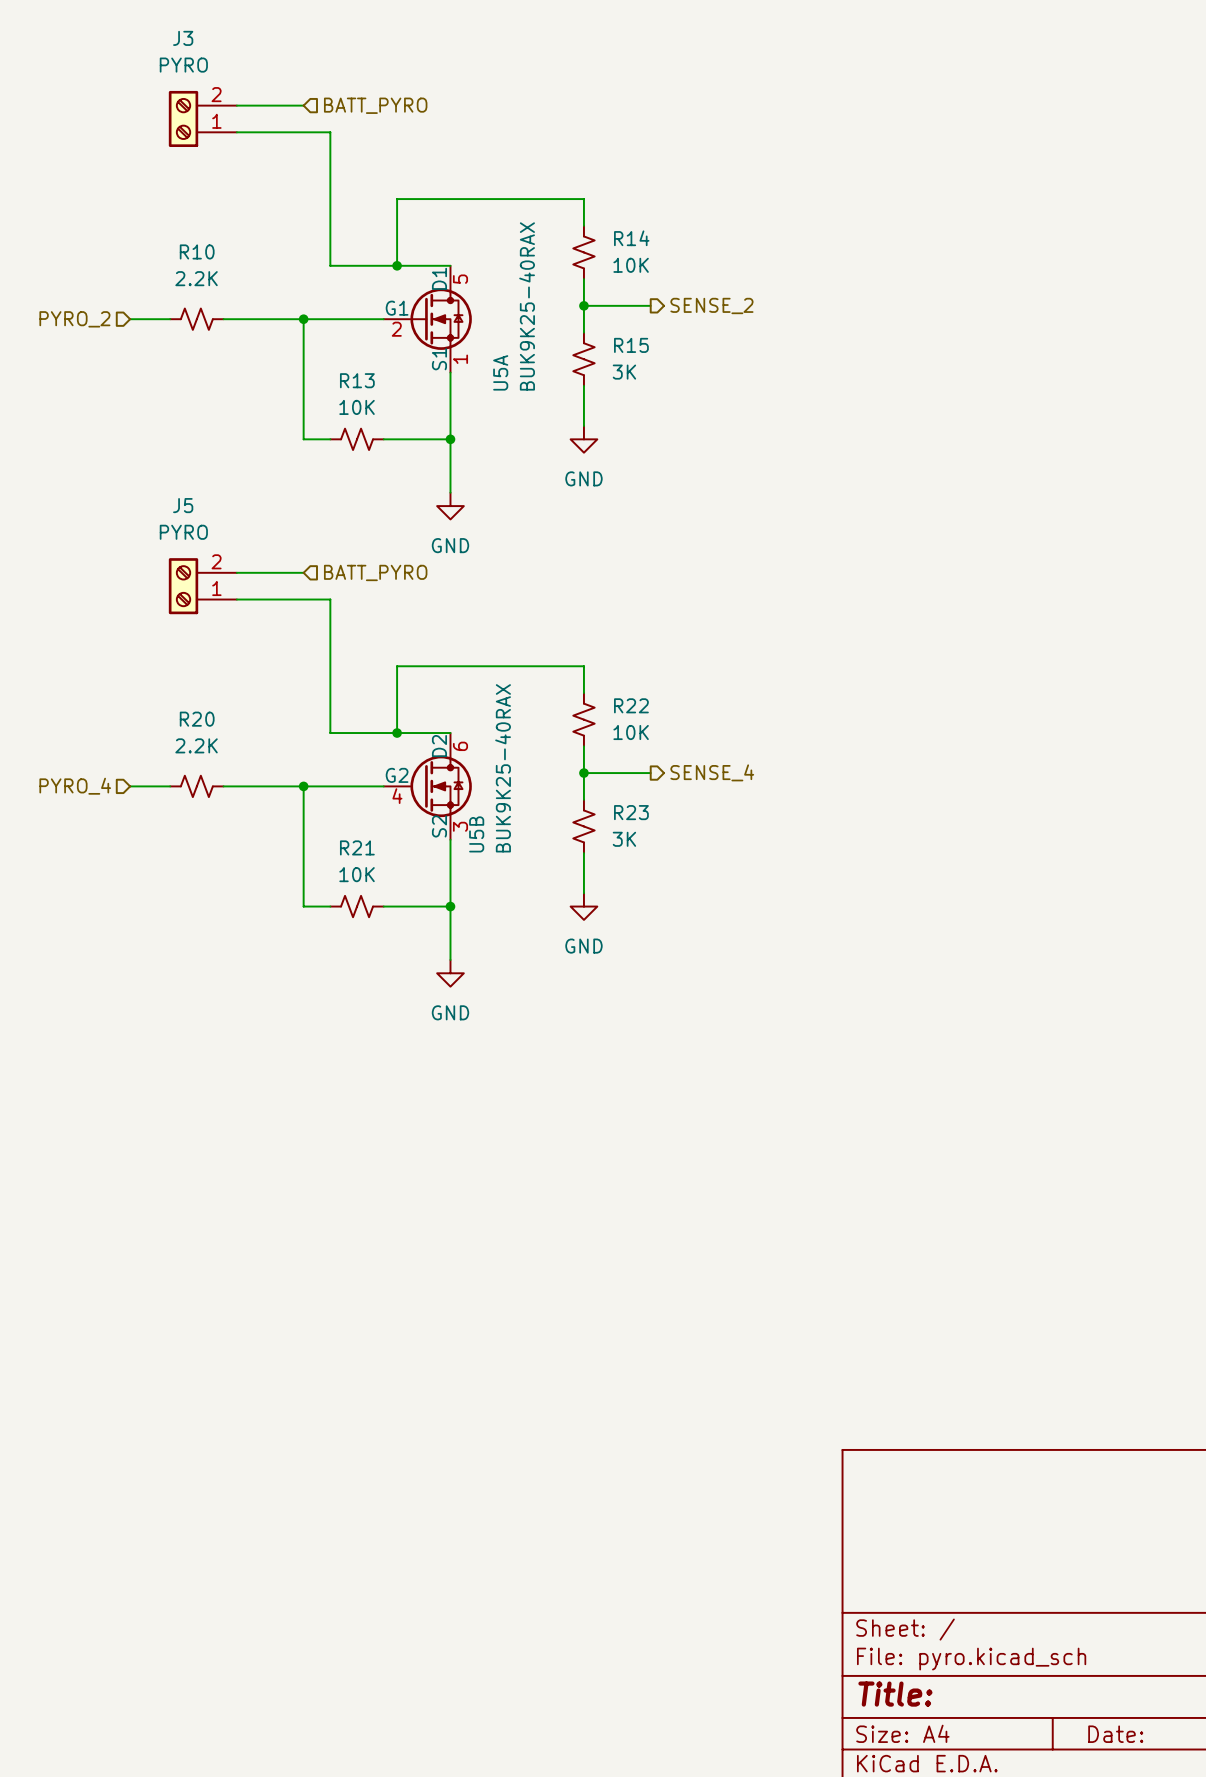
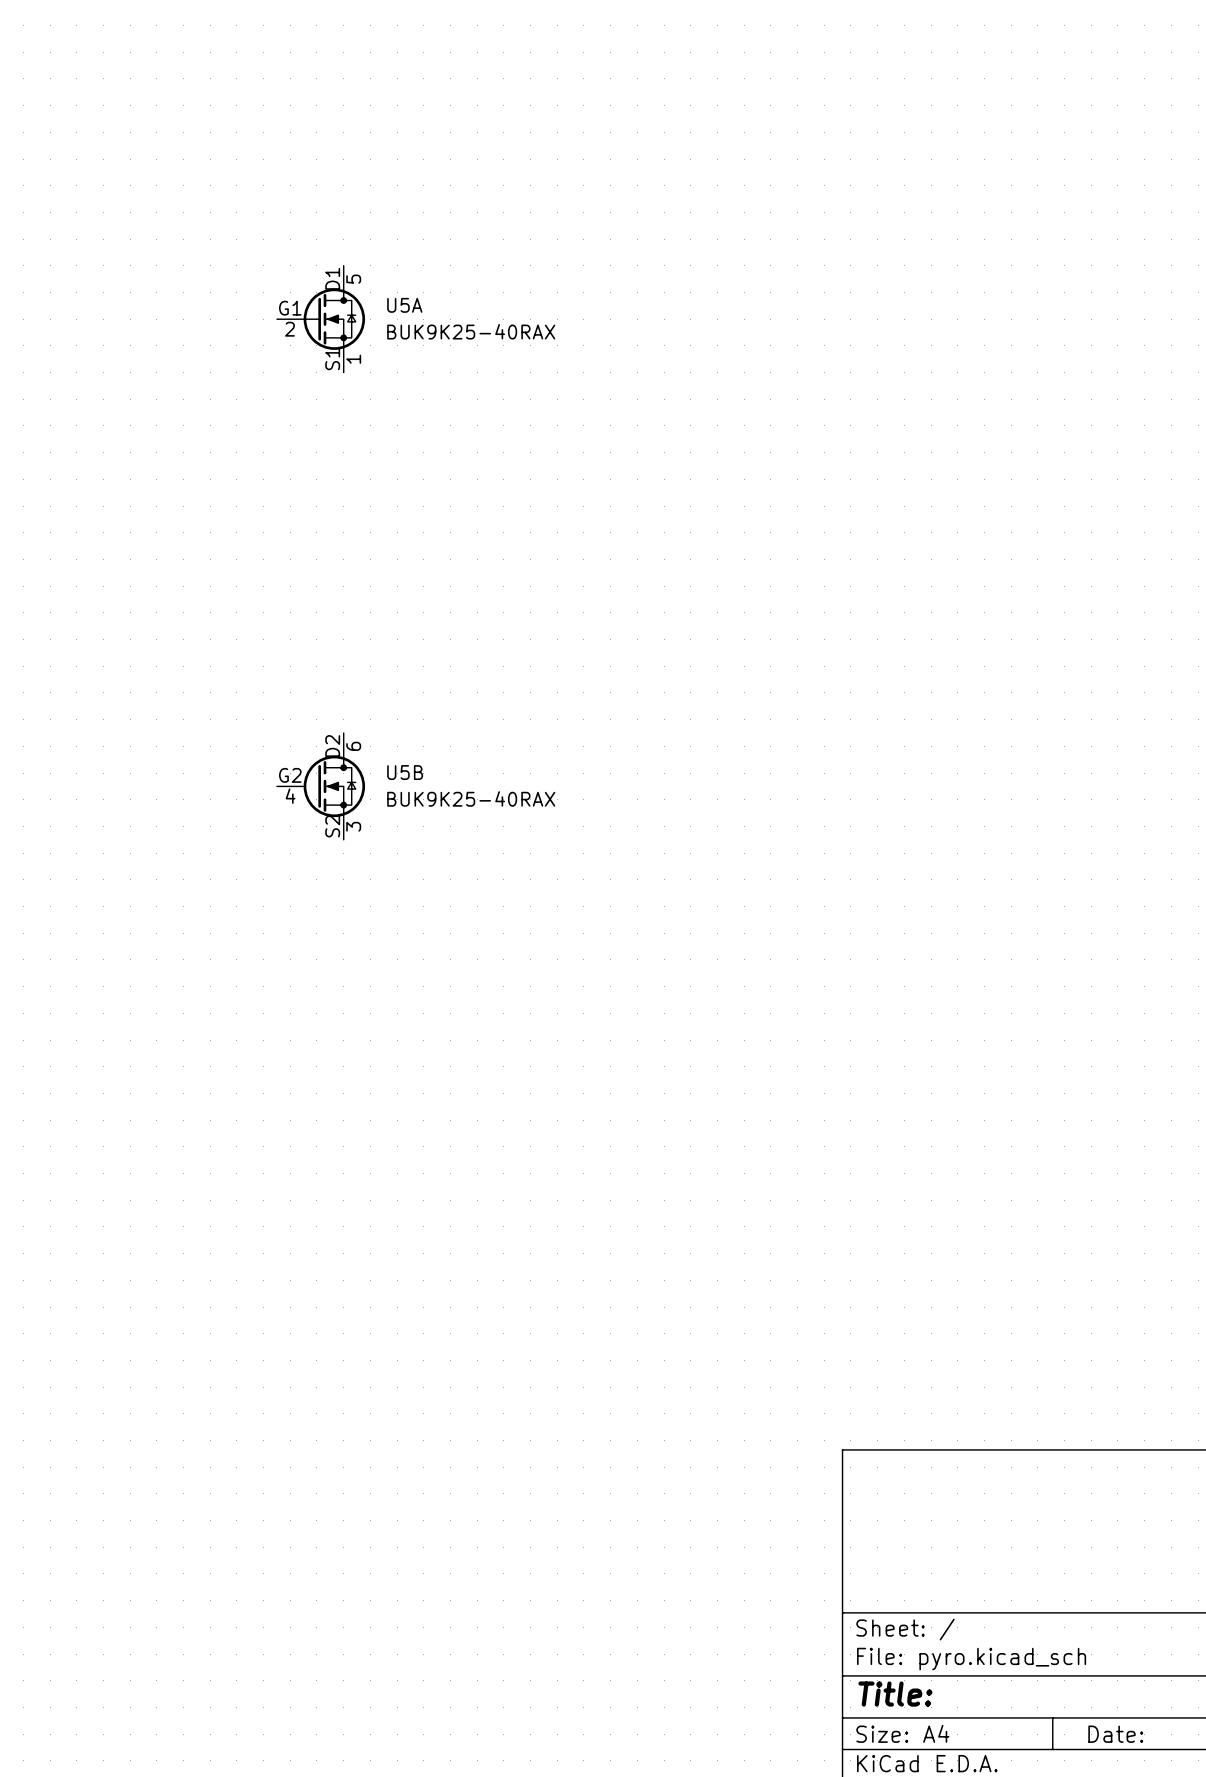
wire: (236, 105) (303, 105) -> none
hierarchical label: BATT_PYRO (375, 105) -> none
J3: PYRO (202, 118) -> none
wire: (236, 132) (330, 132) (330, 265) (450, 265) -> none
wire: (583, 225) (583, 199) (397, 199) (397, 265) -> none
R14: 10K (583, 252) -> none
junction: (397, 265) -> none
wire: (583, 279) (583, 332) -> none
wire: (583, 305) (650, 305) -> none
junction: (583, 305) -> none
hierarchical label: SENSE_2 (711, 305) -> none
U5A value rotation: 0° (527, 306) -> 90° clockwise (471, 331)
hierarchical label: PYRO_2 (74, 319) -> none
wire: (130, 319) (170, 319) -> none
R10: 2.2K (196, 319) -> none
wire: (223, 319) (383, 319) -> none
wire: (303, 319) (303, 439) (330, 439) -> none
junction: (303, 319) -> none
U5A position: (427, 319) -> (321, 319)
R15: 3K (583, 359) -> none
wire: (450, 372) (450, 492) -> none
U5A name rotation: 0° (500, 372) -> 90° clockwise (404, 305)
U5A name position: U5A (500, 372) -> U5A (404, 305)
wire: (583, 385) (583, 425) -> none
R13: 10K (357, 439) -> none
wire: (383, 439) (450, 439) -> none
junction: (450, 439) -> none
power symbol: GND (583, 439) -> none
power symbol: GND (450, 506) -> none
wire: (236, 572) (303, 572) -> none
hierarchical label: BATT_PYRO (375, 572) -> none
J5: PYRO (202, 586) -> none
wire: (236, 599) (330, 599) (330, 733) (450, 733) -> none
wire: (583, 692) (583, 666) (397, 666) (397, 733) -> none
R22: 10K (583, 719) -> none
junction: (397, 733) -> none
wire: (583, 746) (583, 799) -> none
U5B value rotation: 0° (503, 768) -> 90° clockwise (471, 798)
hierarchical label: SENSE_4 (712, 772) -> none
wire: (583, 773) (650, 773) -> none
junction: (583, 773) -> none
hierarchical label: PYRO_4 (75, 786) -> none
wire: (130, 786) (170, 786) -> none
R20: 2.2K (196, 786) -> none
wire: (223, 786) (383, 786) -> none
wire: (303, 786) (303, 906) (330, 906) -> none
junction: (303, 786) -> none
U5B position: (427, 786) -> (321, 786)
R23: 3K (583, 826) -> none
U5B name rotation: 0° (476, 834) -> 90° clockwise (405, 772)
U5B name position: U5B (476, 834) -> U5B (405, 772)
wire: (450, 839) (450, 959) -> none
wire: (583, 853) (583, 893) -> none
R21: 10K (357, 906) -> none
wire: (383, 906) (450, 906) -> none
junction: (450, 906) -> none
power symbol: GND (583, 906) -> none
power symbol: GND (450, 973) -> none

